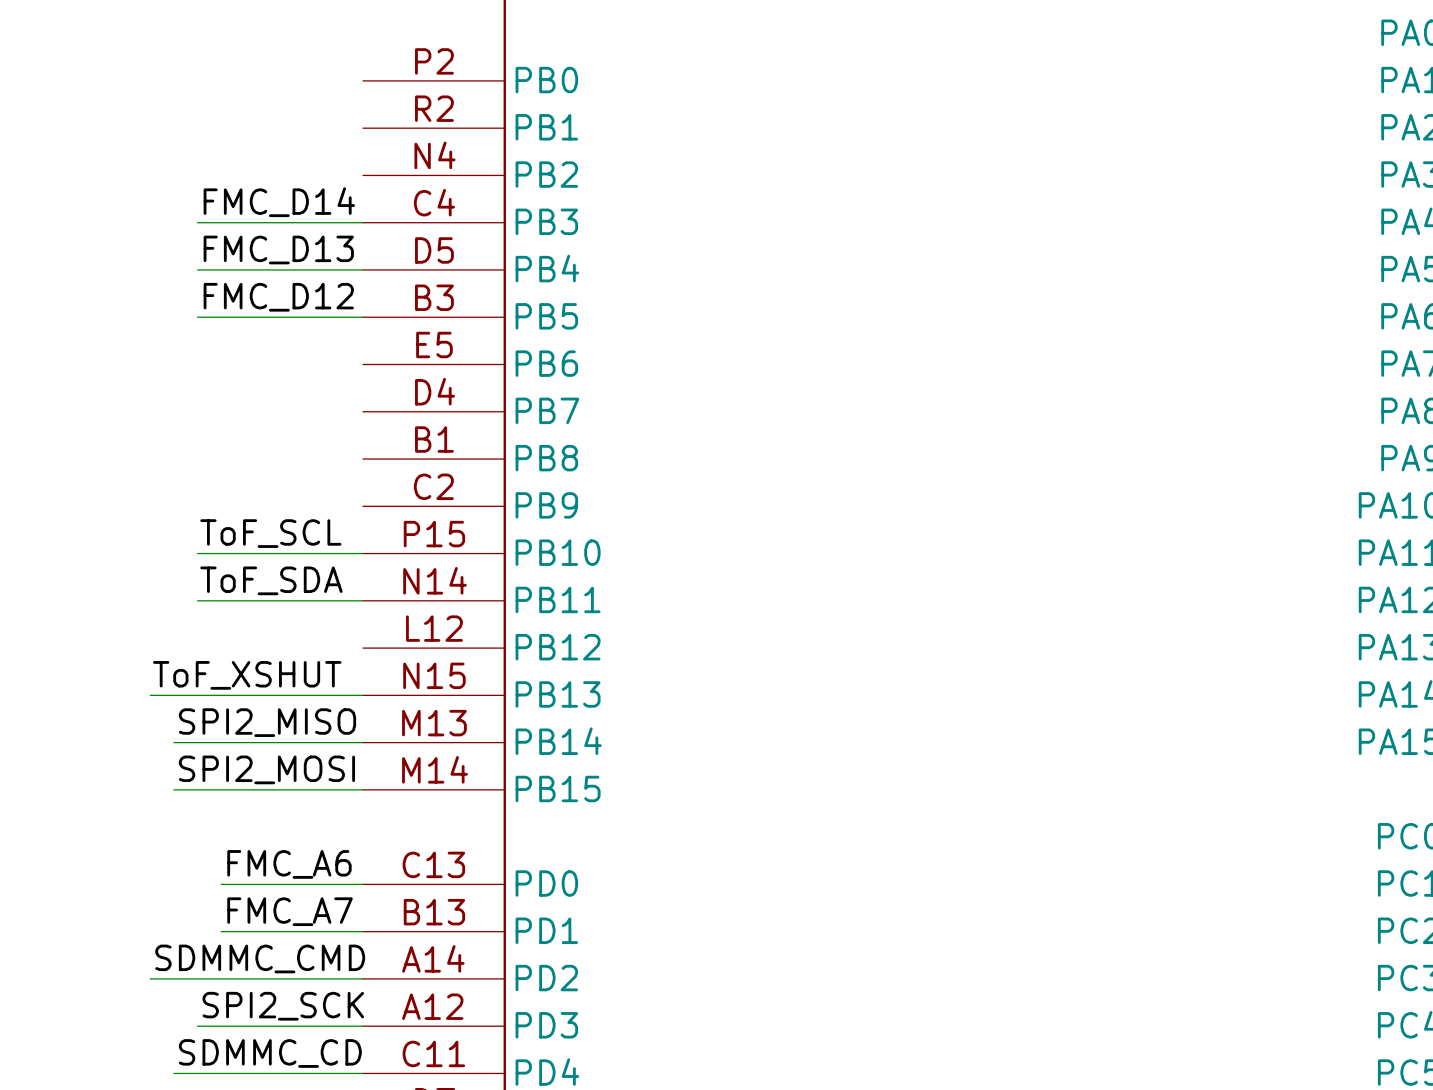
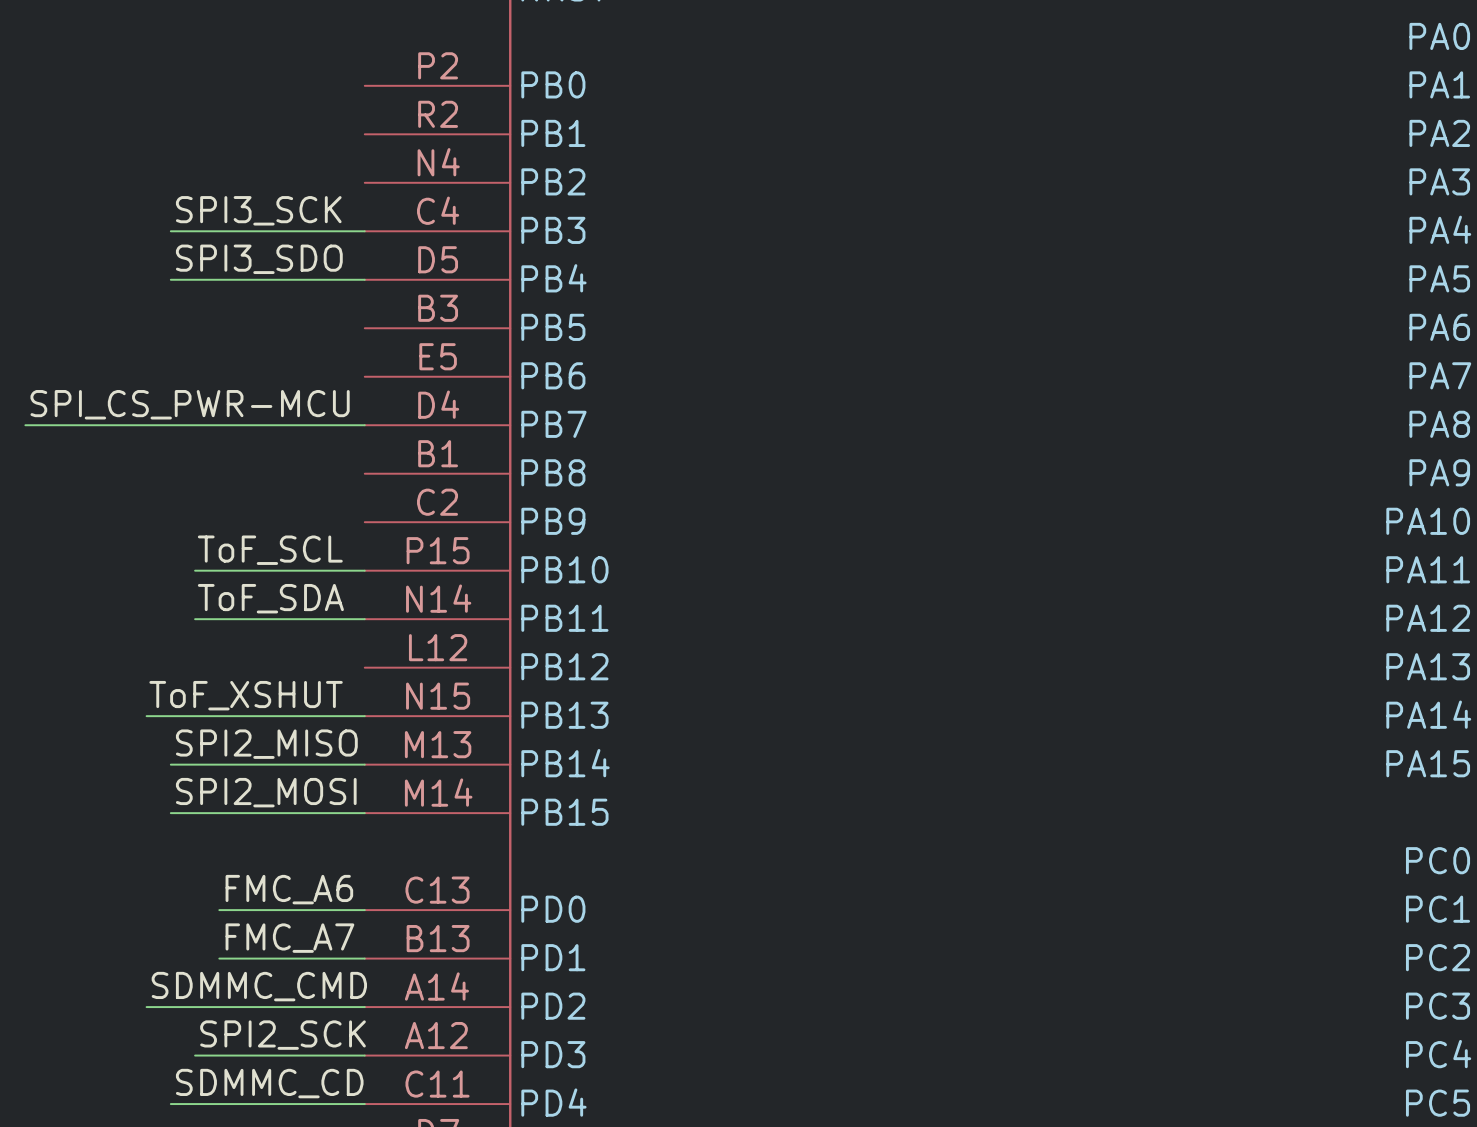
label: none -> SPI3_SCK (258, 210)
label: FMC_D14 (279, 202) -> none
wire: none -> (170, 231) (195, 231)
label: none -> SPI3_SDO (259, 259)
label: FMC_D13 (278, 250) -> none
wire: none -> (170, 279) (195, 279)
label: FMC_D12 (278, 297) -> none
wire: (197, 317) (362, 317) -> none
label: none -> SPI_CS_PWR-MCU (190, 404)
wire: none -> (25, 425) (364, 425)

